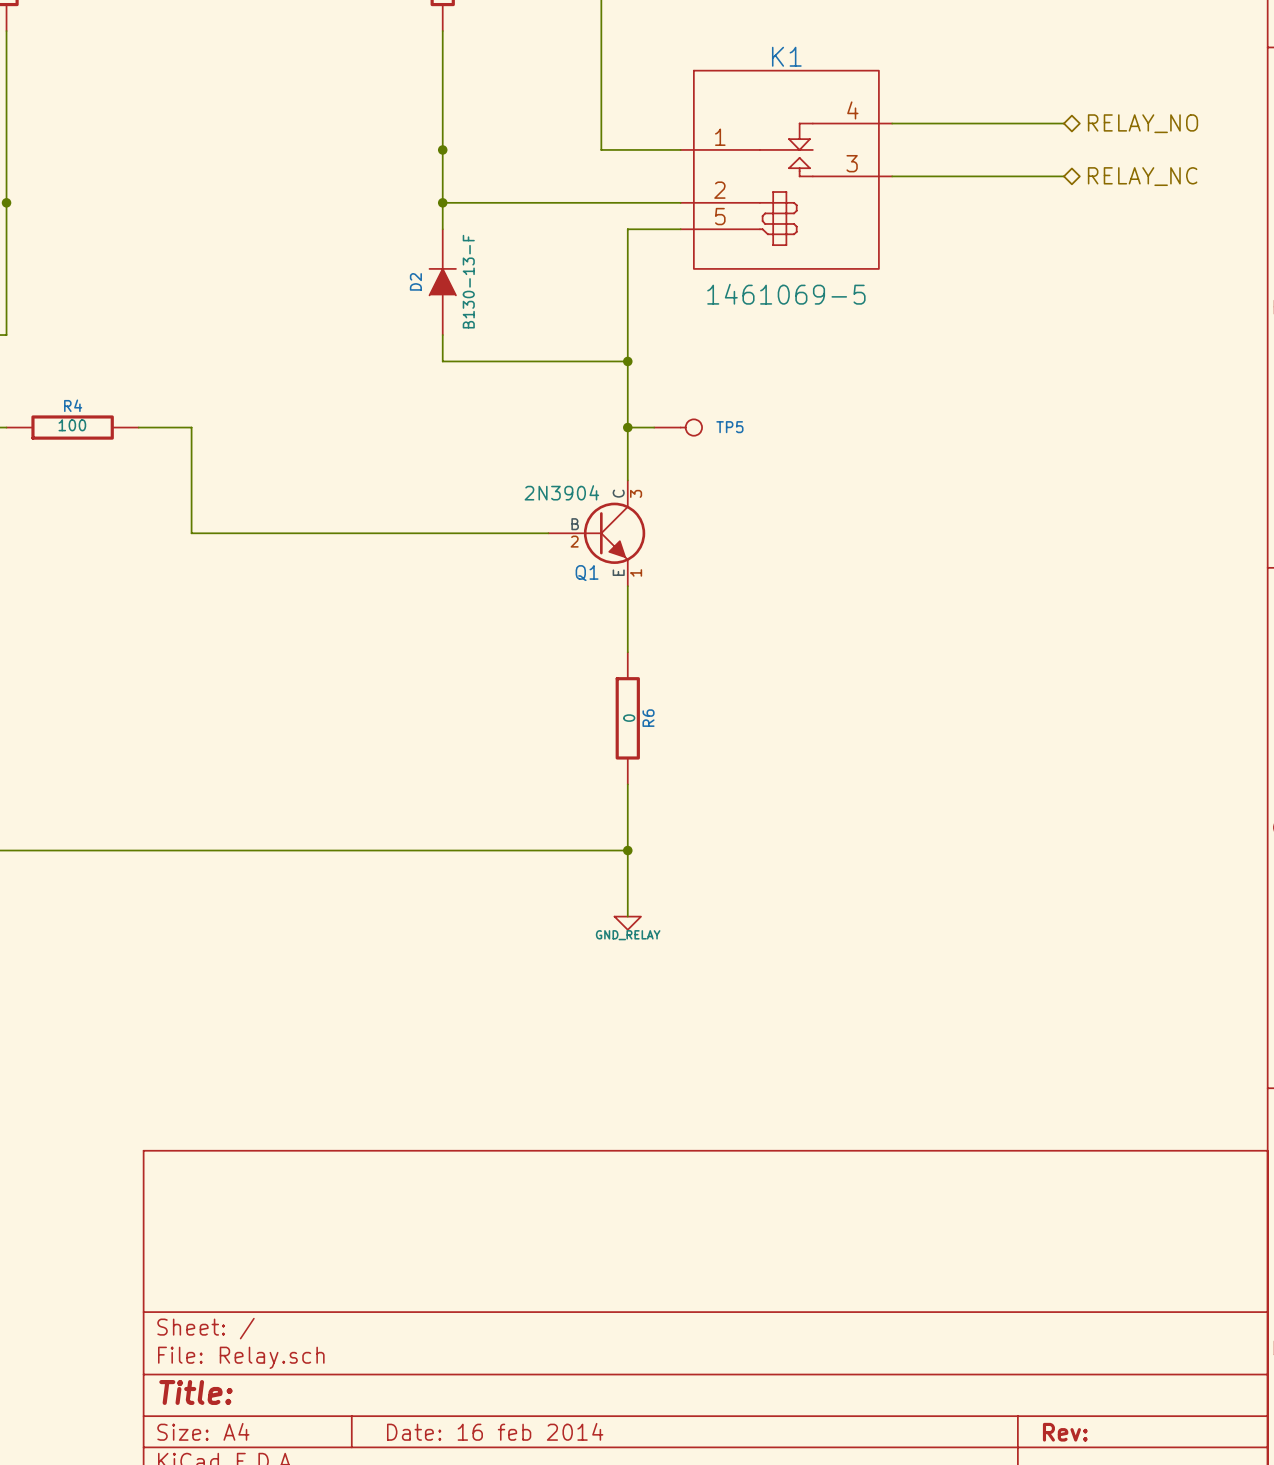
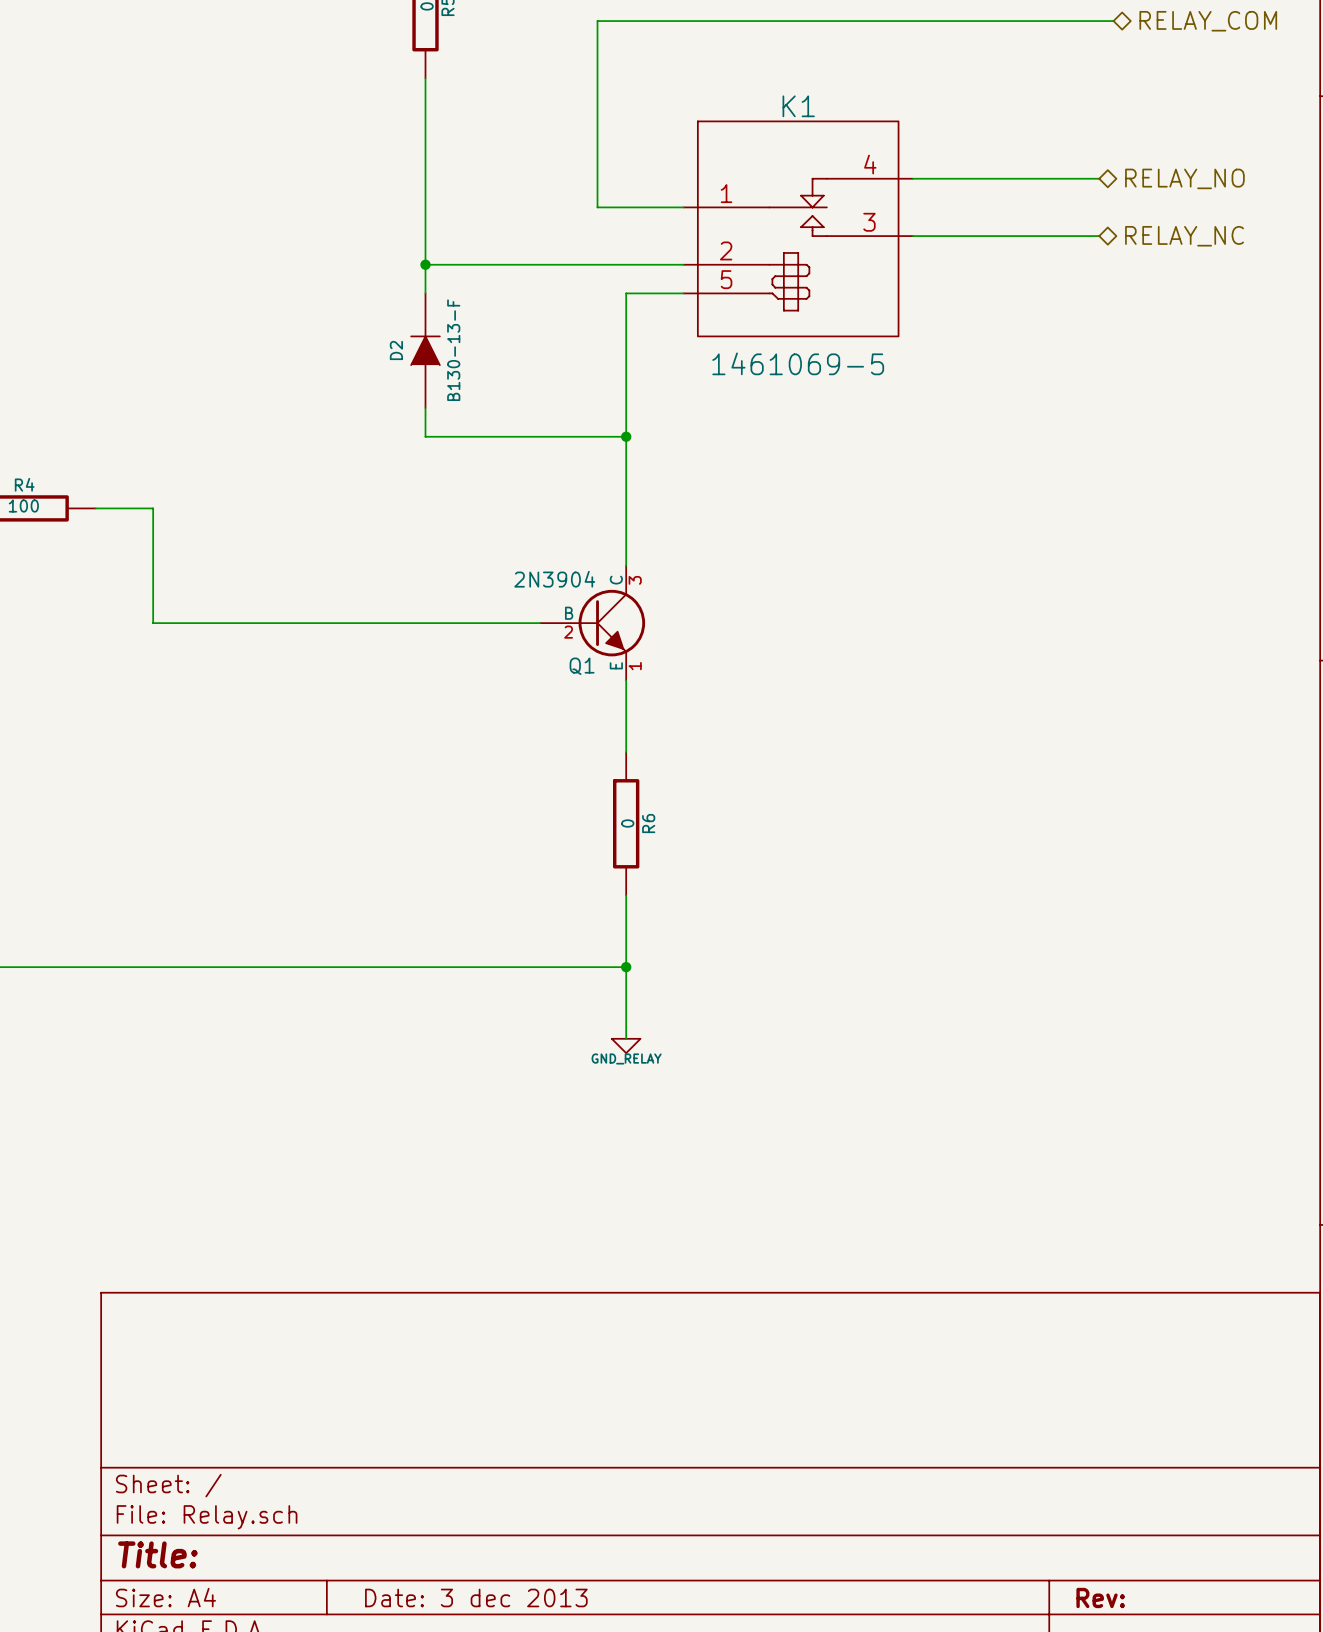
junction: (442, 149) -> none
wire: (627, 427) (654, 427) -> none
junction: (627, 427) -> none
TP5: (678, 427) -> none
title block: Date: 16 feb 2014 (495, 1431) -> Date: 3 dec 2013 (476, 1597)

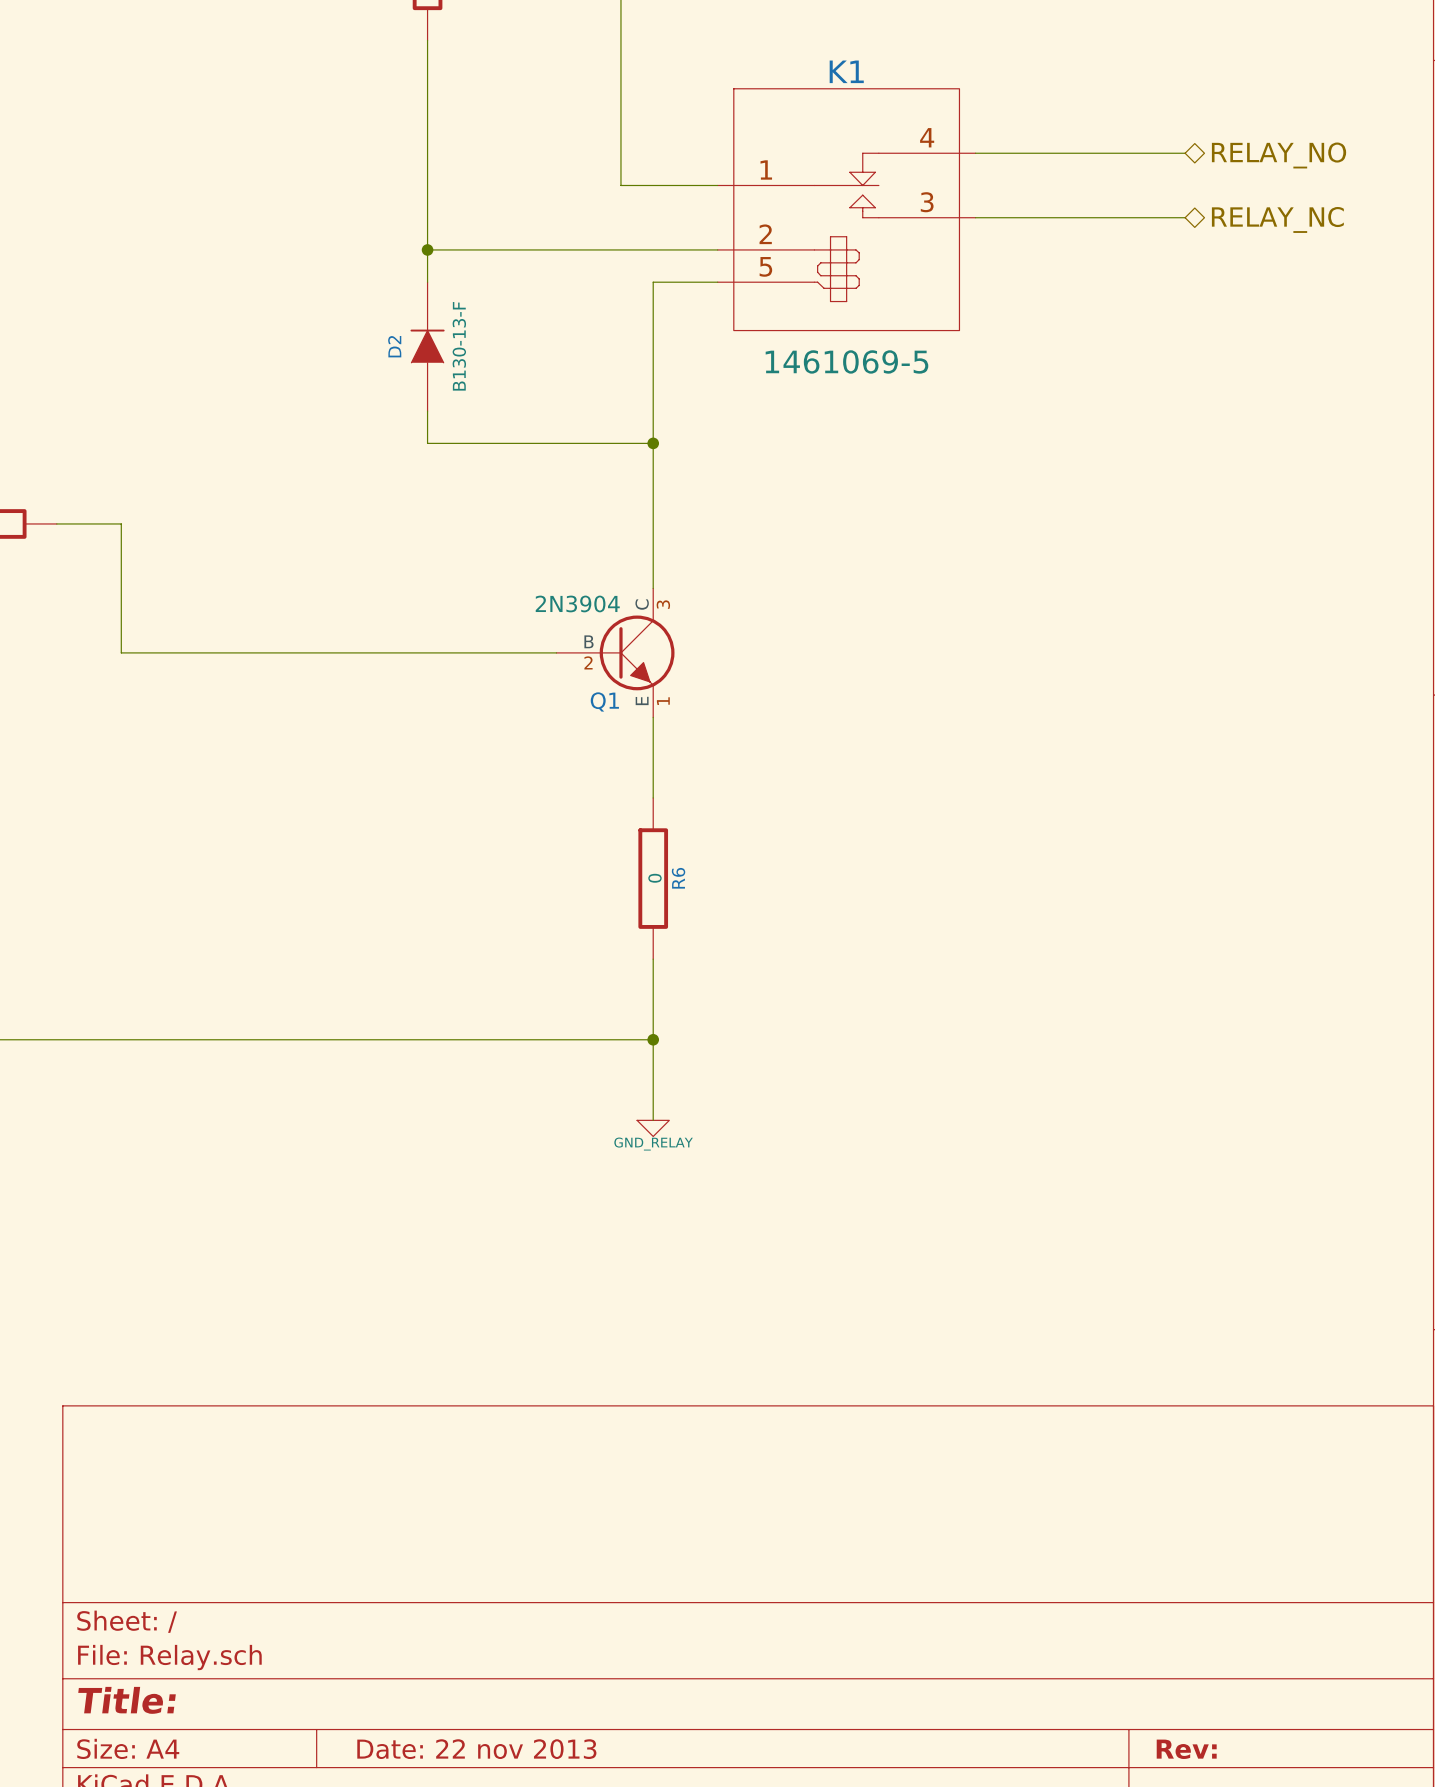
title block: Date: 3 dec 2013 (476, 1597) -> Date: 22 nov 2013 (476, 1749)

